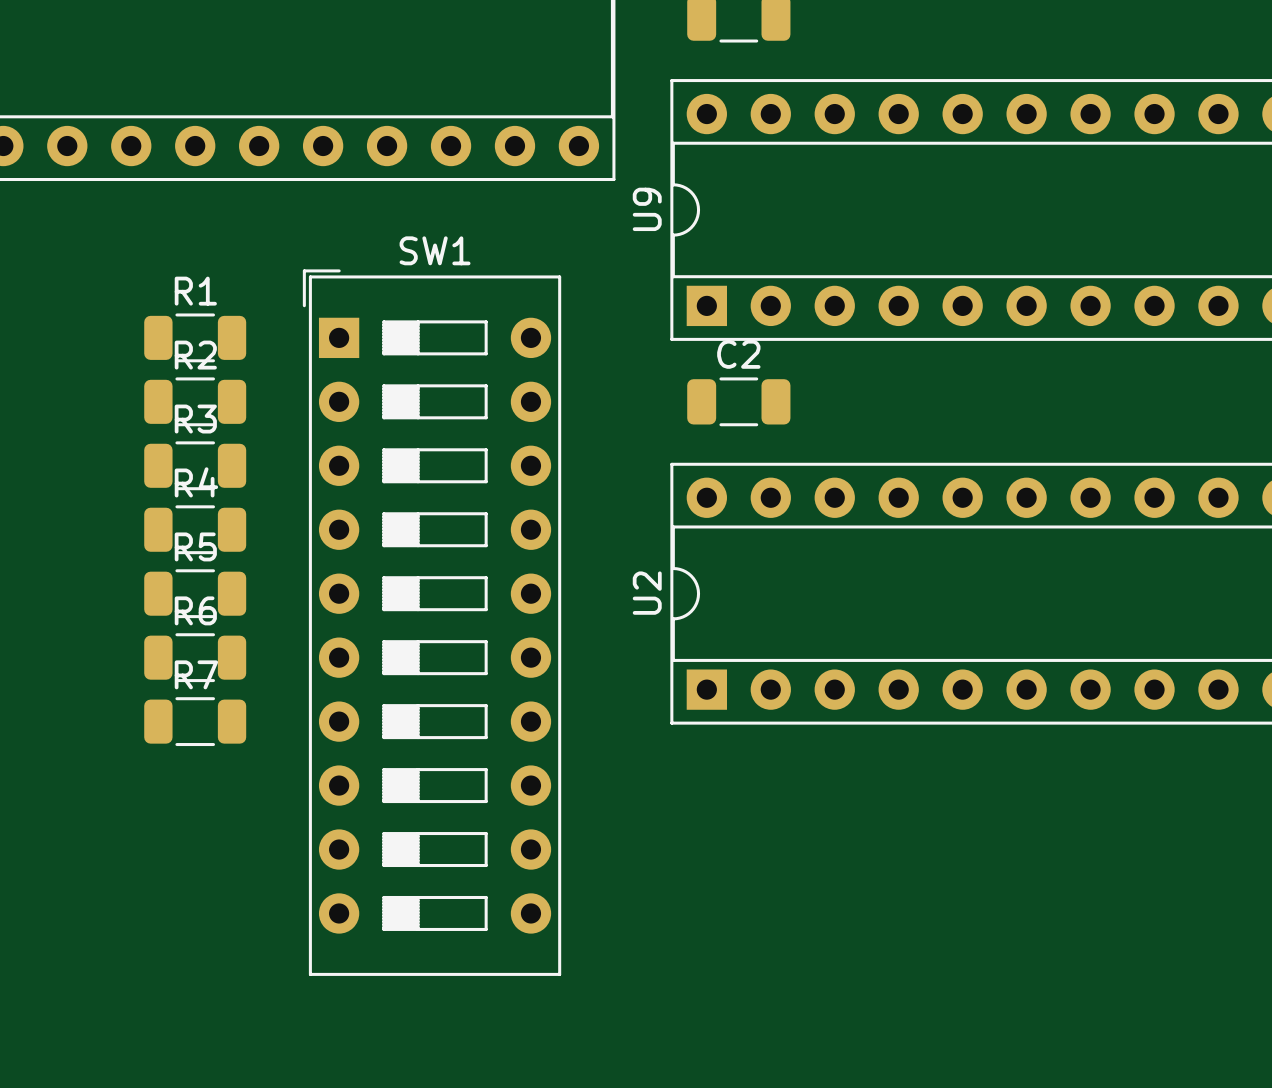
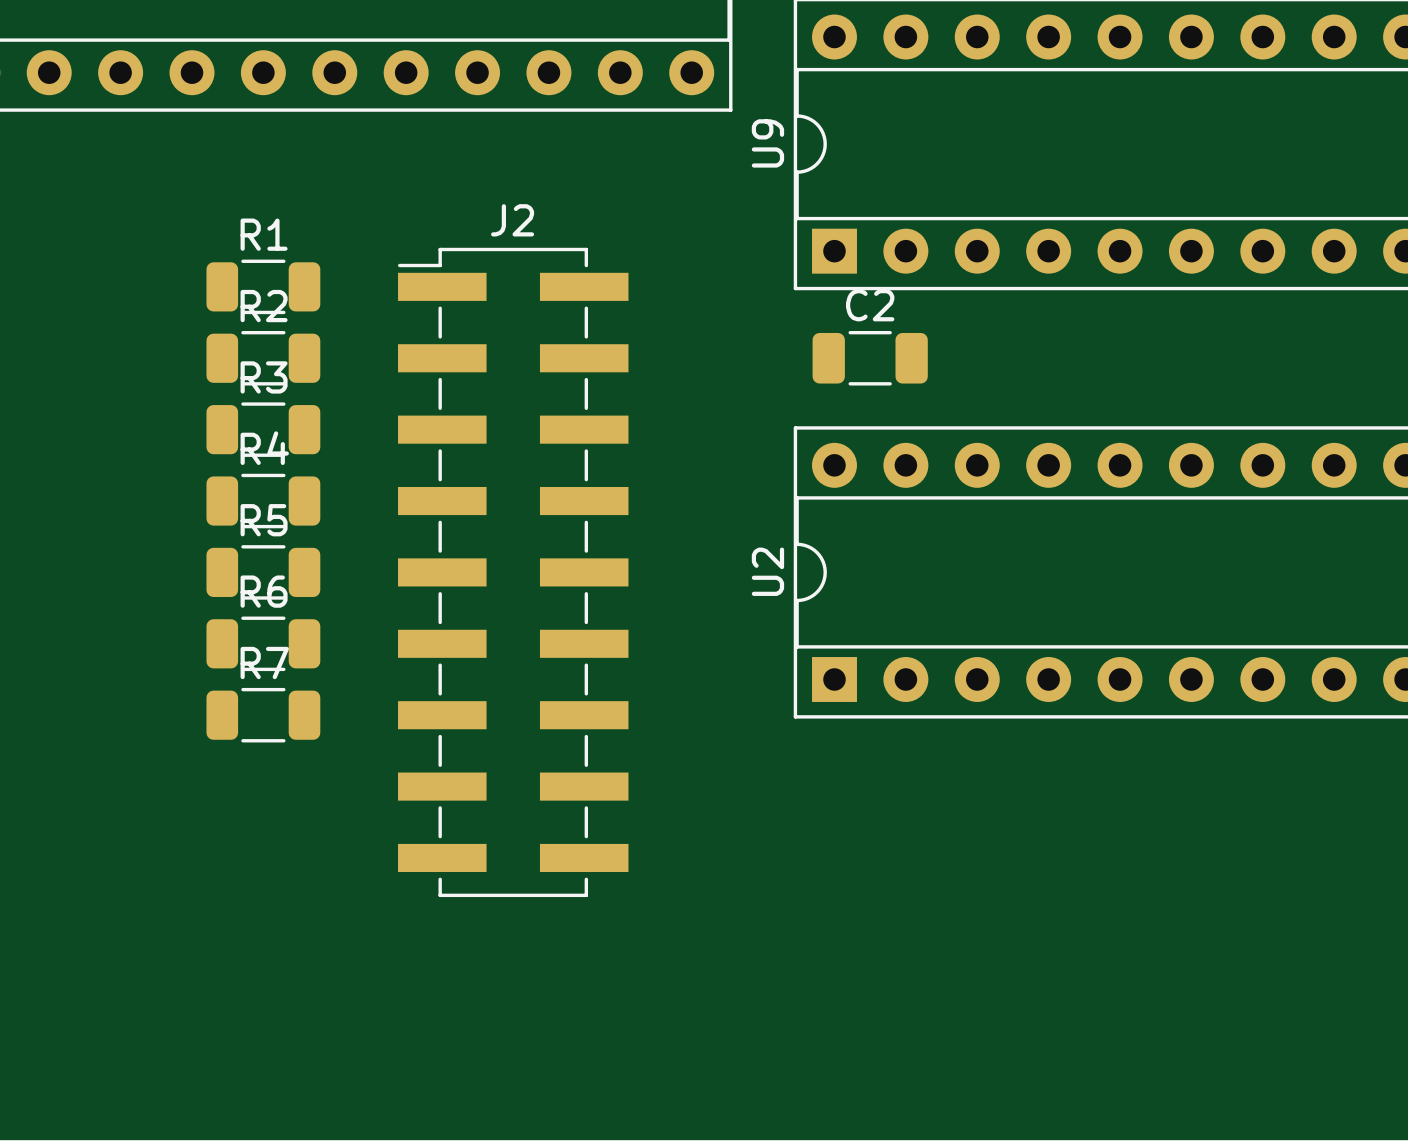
J2: none -> (513, 572)
SW1: (432, 622) -> none

